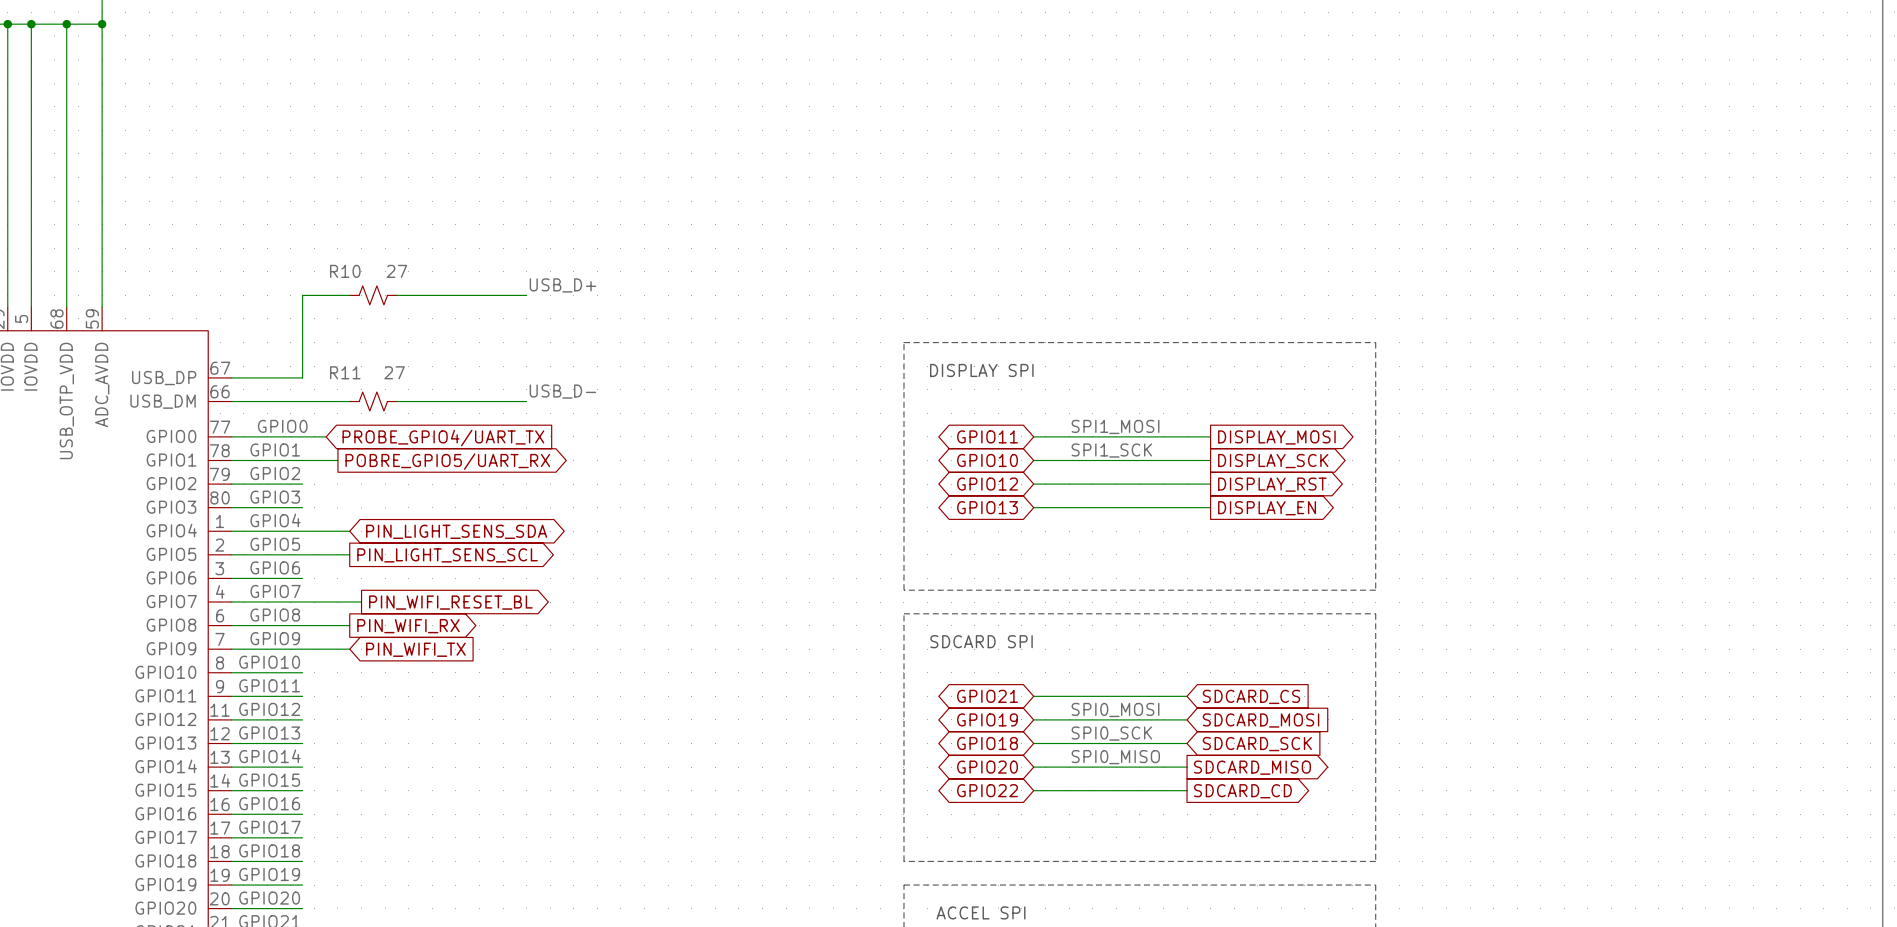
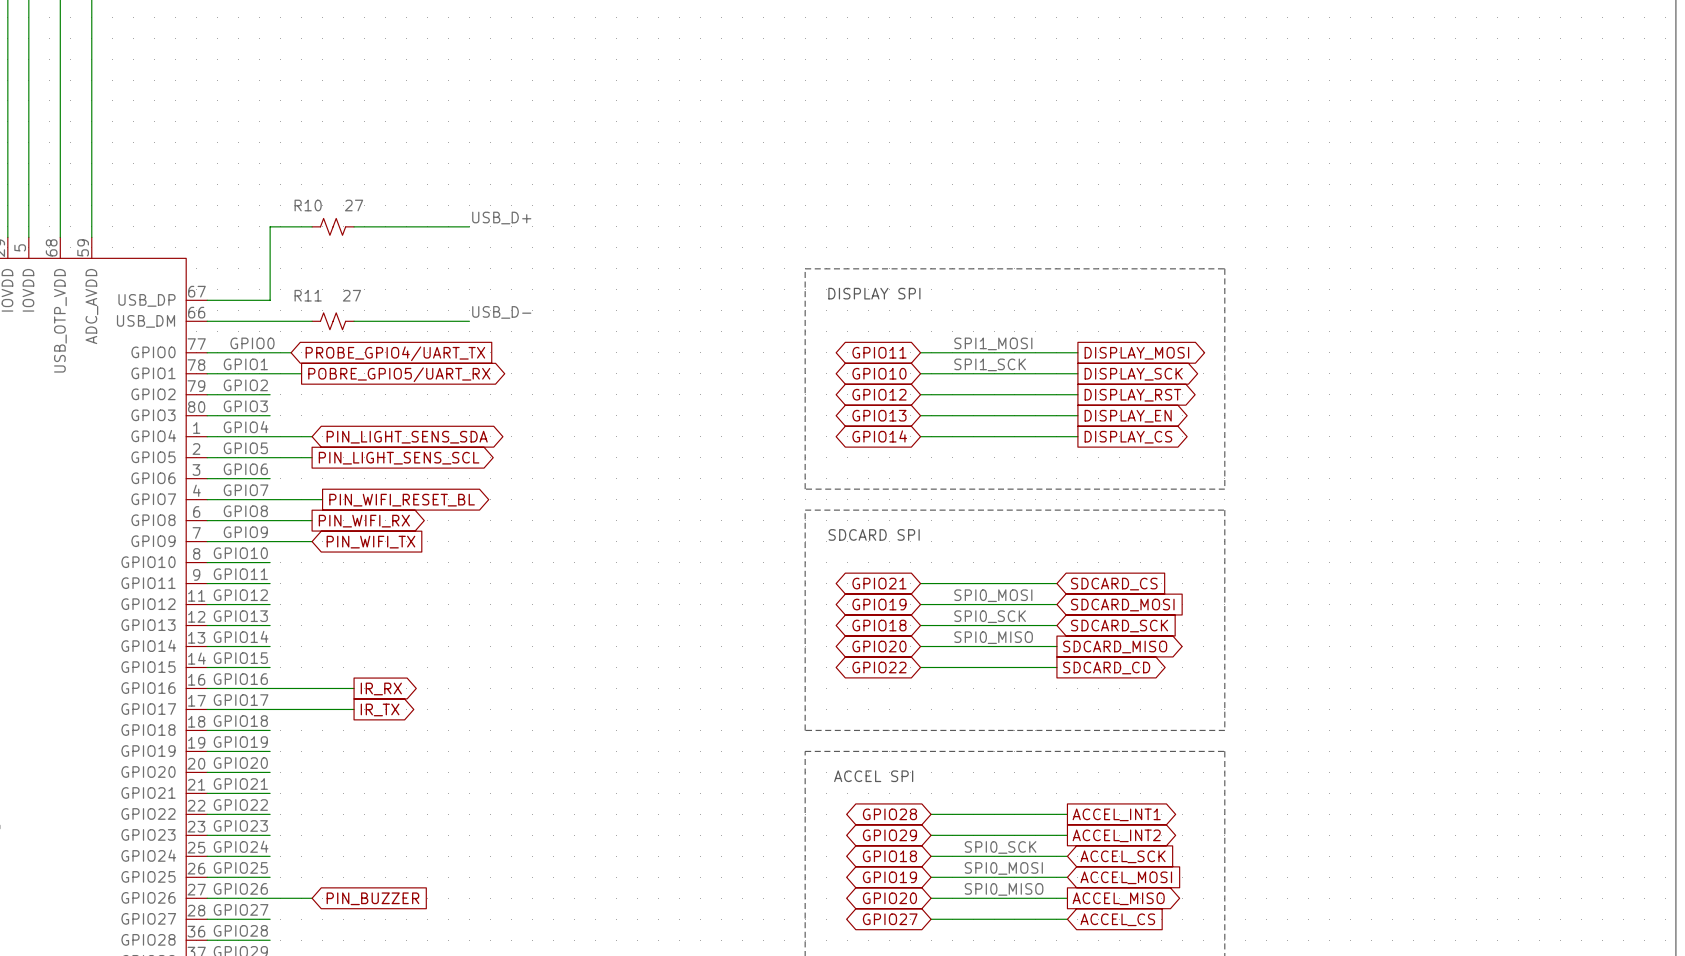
global label: none -> GPIO14 (879, 436)
wire: none -> (920, 436) (1077, 436)
global label: none -> DISPLAY_CS (1128, 437)
wire: none -> (270, 688) (354, 688)
global label: none -> IR_RX (381, 688)
wire: none -> (270, 709) (354, 709)
global label: none -> IR_TX (380, 709)

